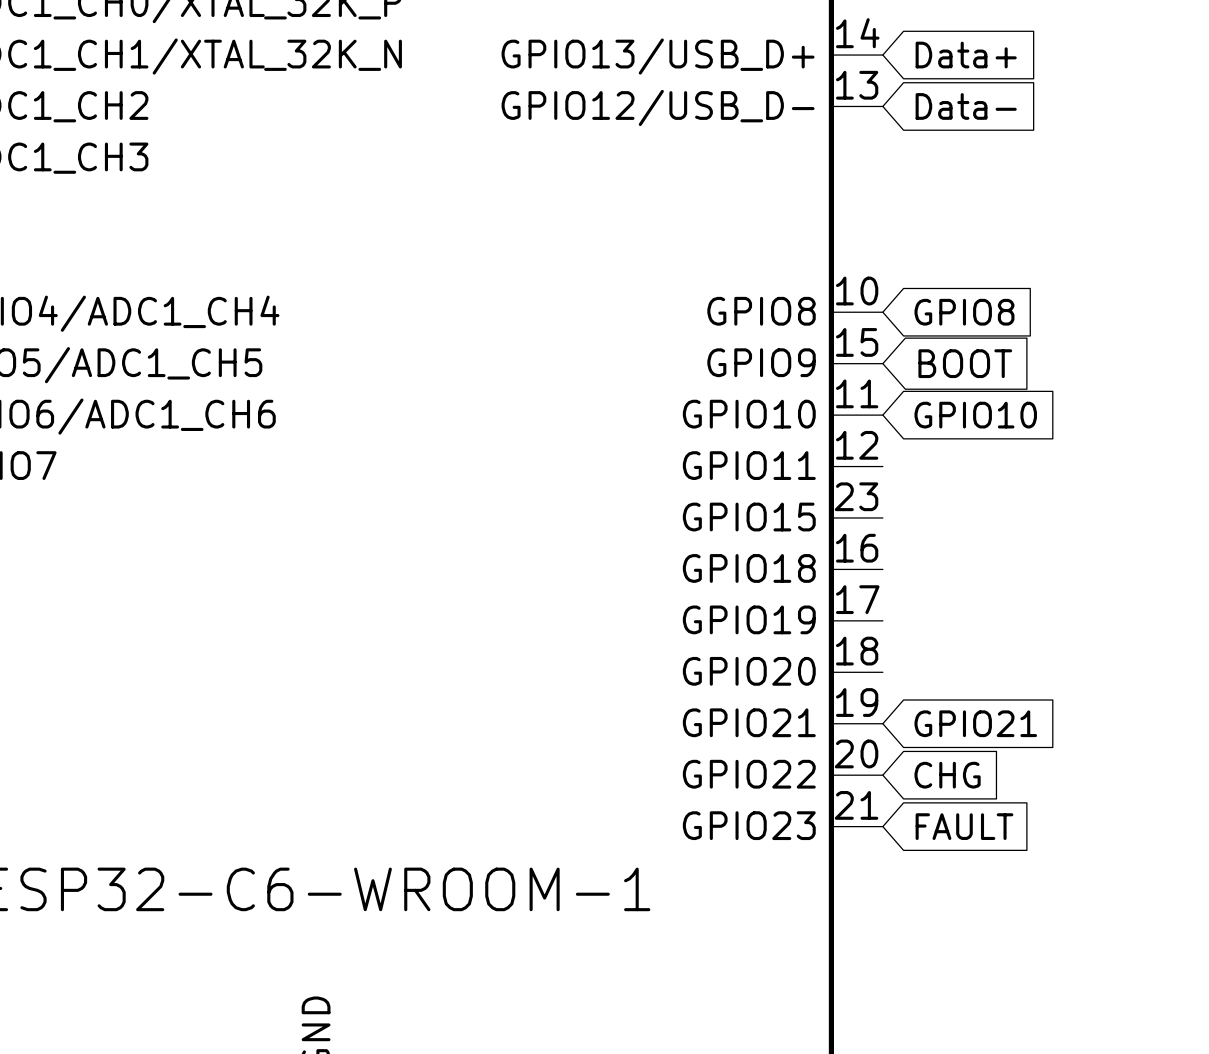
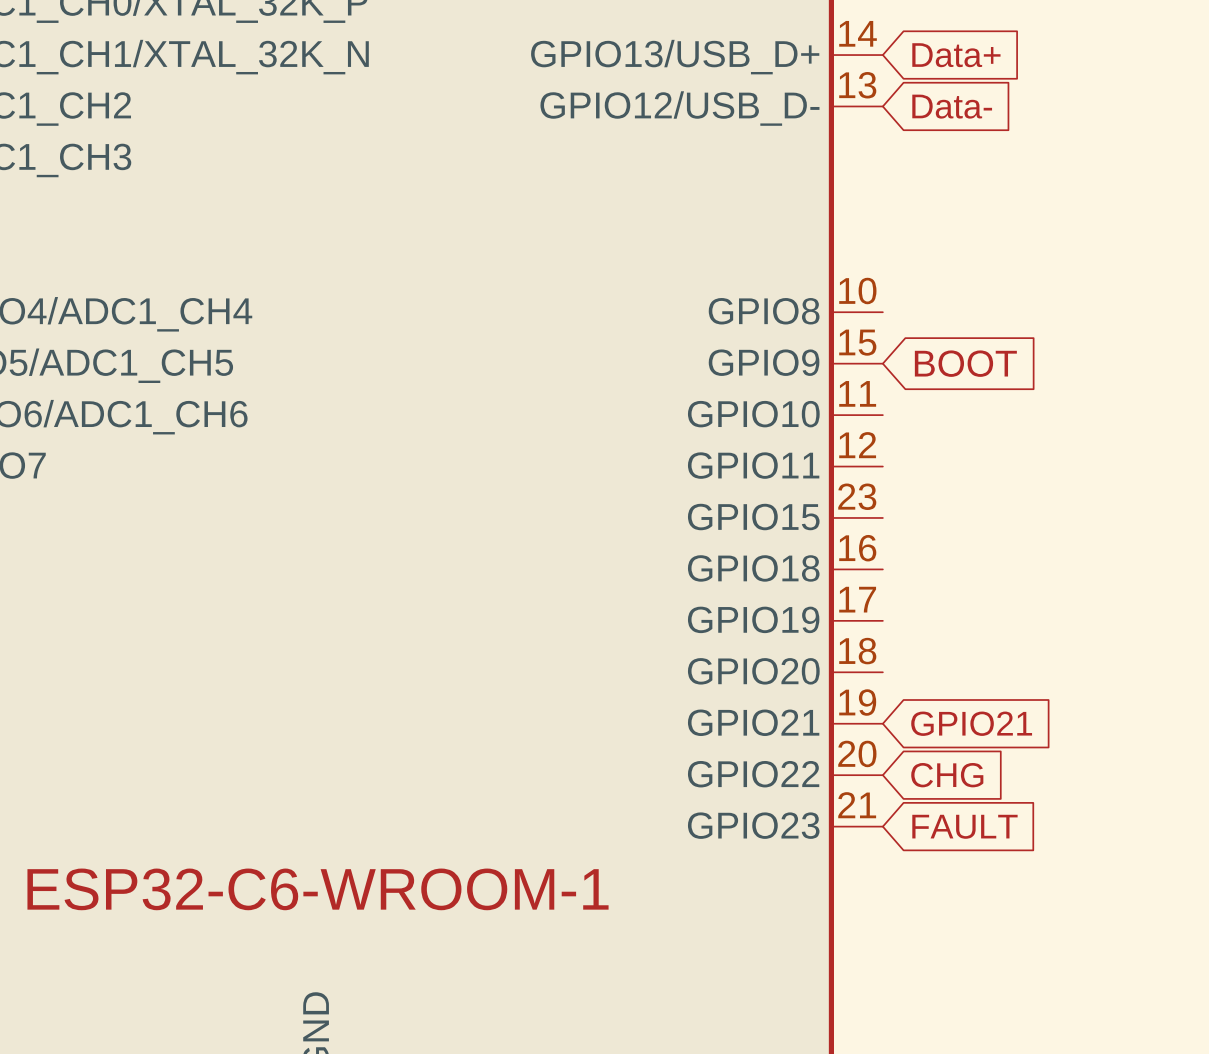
global label: GPIO8 (964, 312) -> none
global label: GPIO10 (975, 415) -> none

